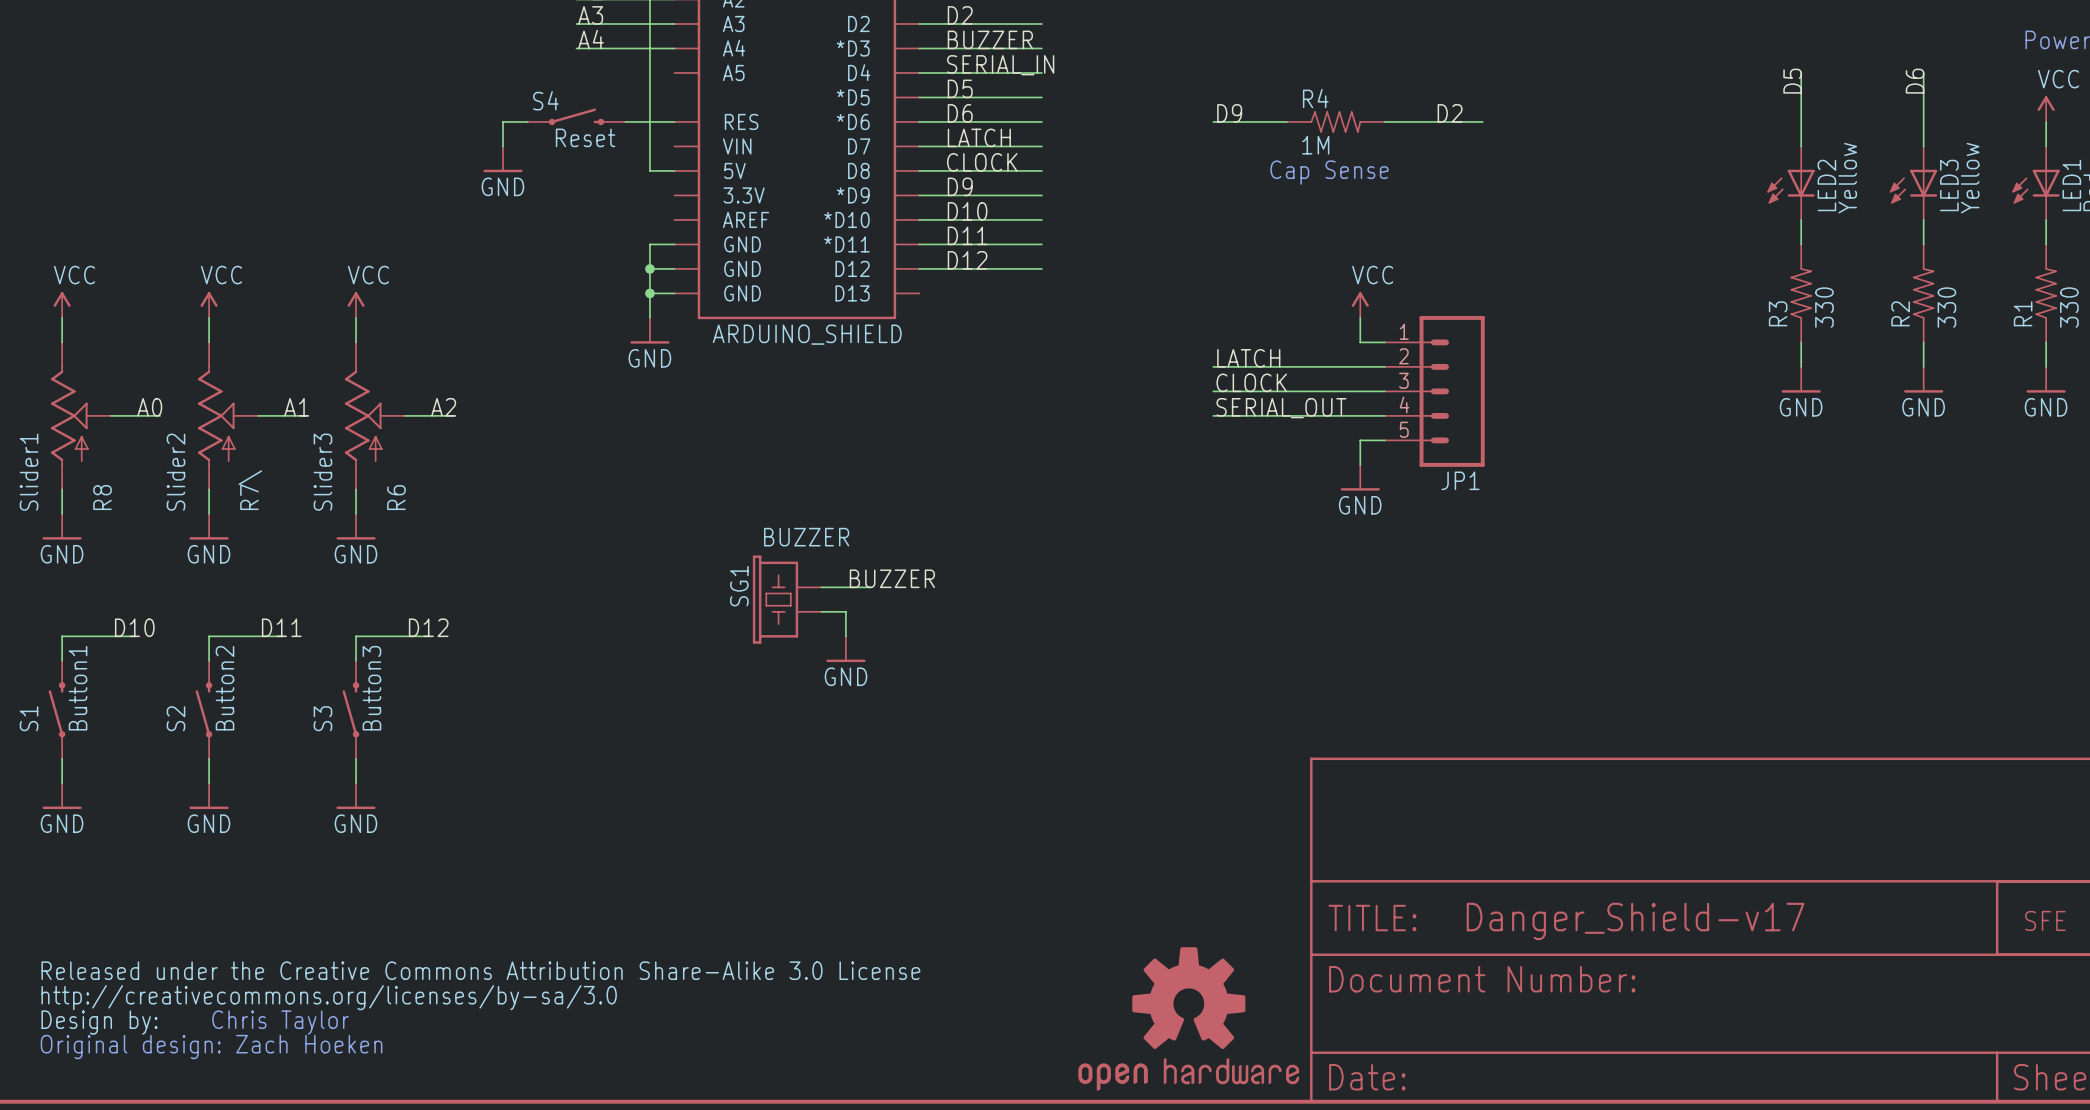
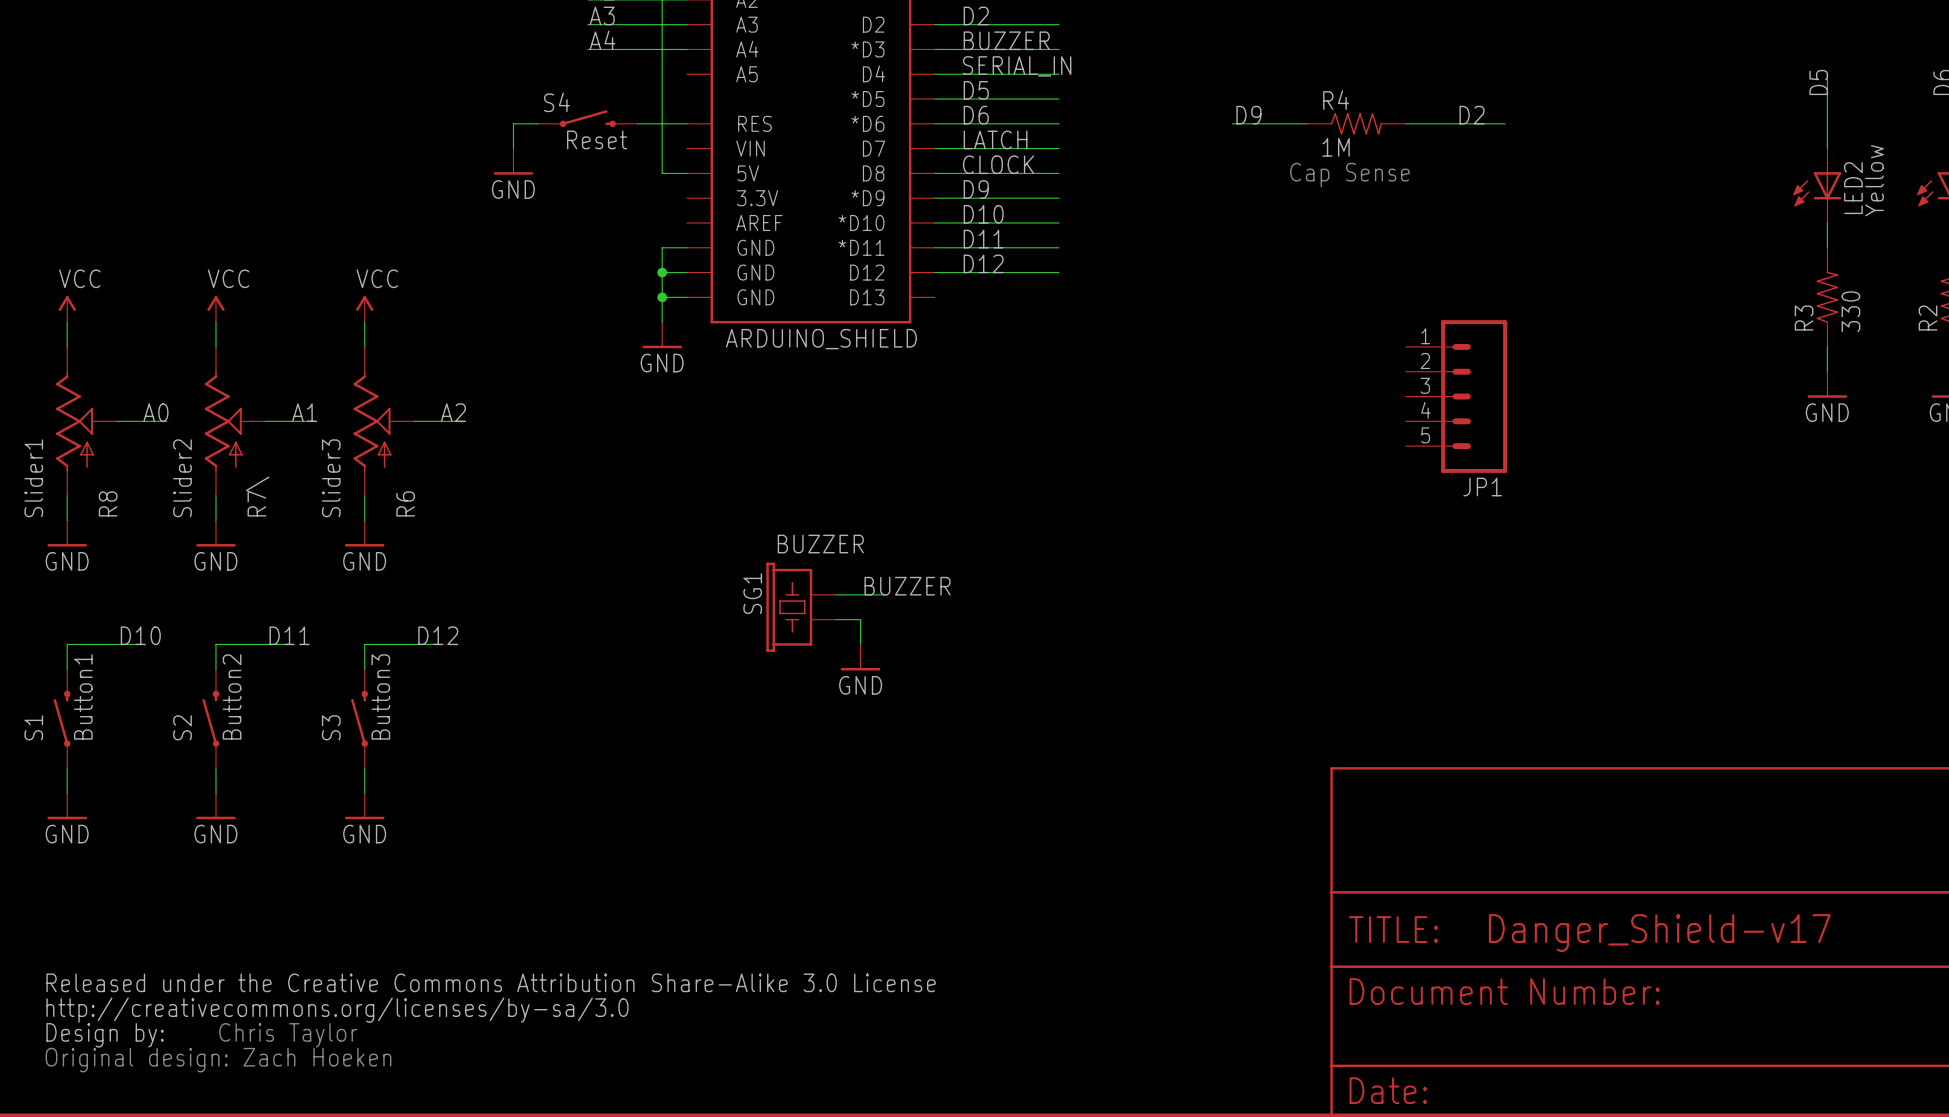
power symbol: VCC (1360, 305) -> none
wire: (1360, 317) (1360, 342) (1384, 342) -> none
label: LATCH (1248, 358) -> none
wire: (1213, 366) (1384, 366) -> none
label: CLOCK (1251, 382) -> none
wire: (1213, 391) (1384, 391) -> none
label: SERIAL_OUT (1281, 408) -> none
wire: (1213, 415) (1384, 415) -> none
wire: (1384, 440) (1360, 440) (1360, 464) -> none
power symbol: GND (1360, 477) -> none
part: (1188, 1018) -> none

